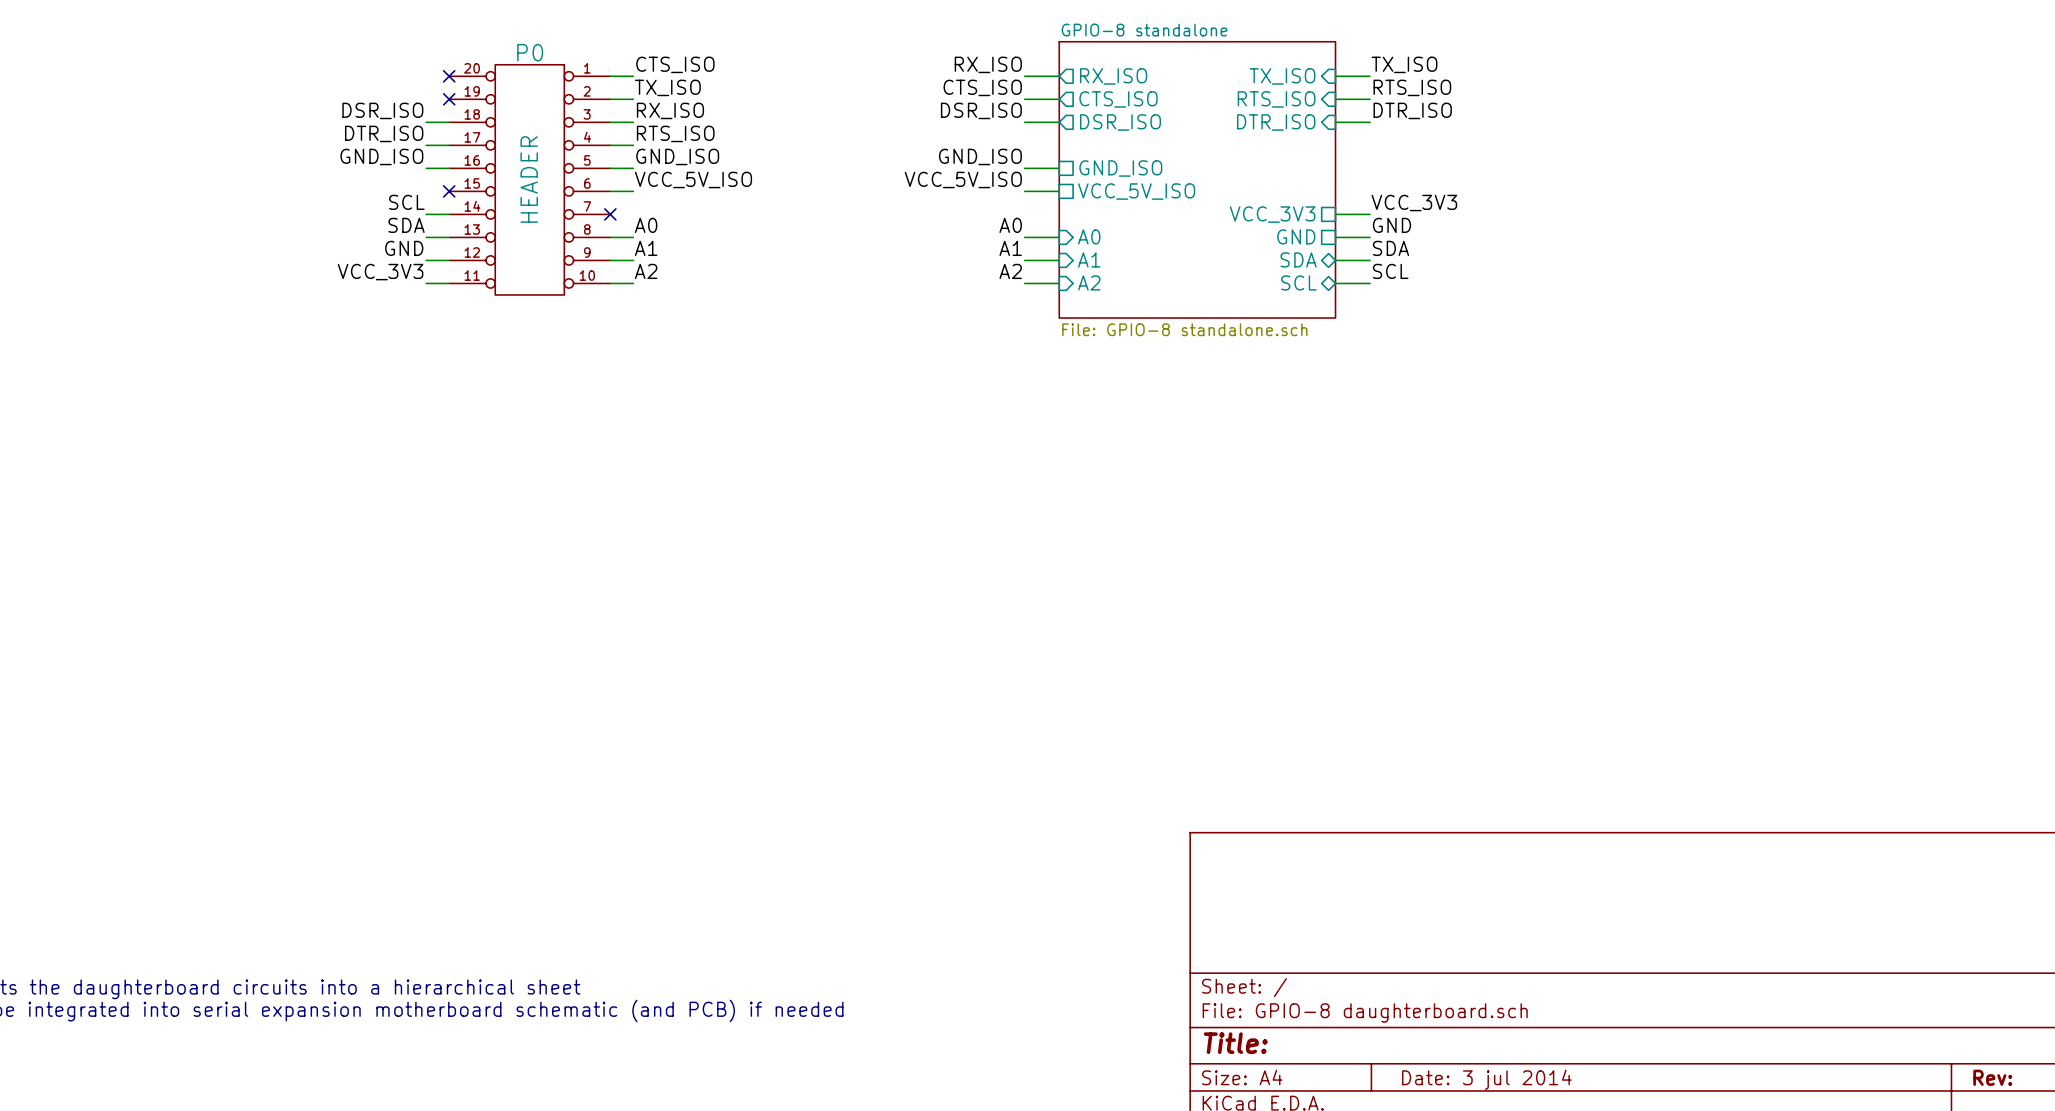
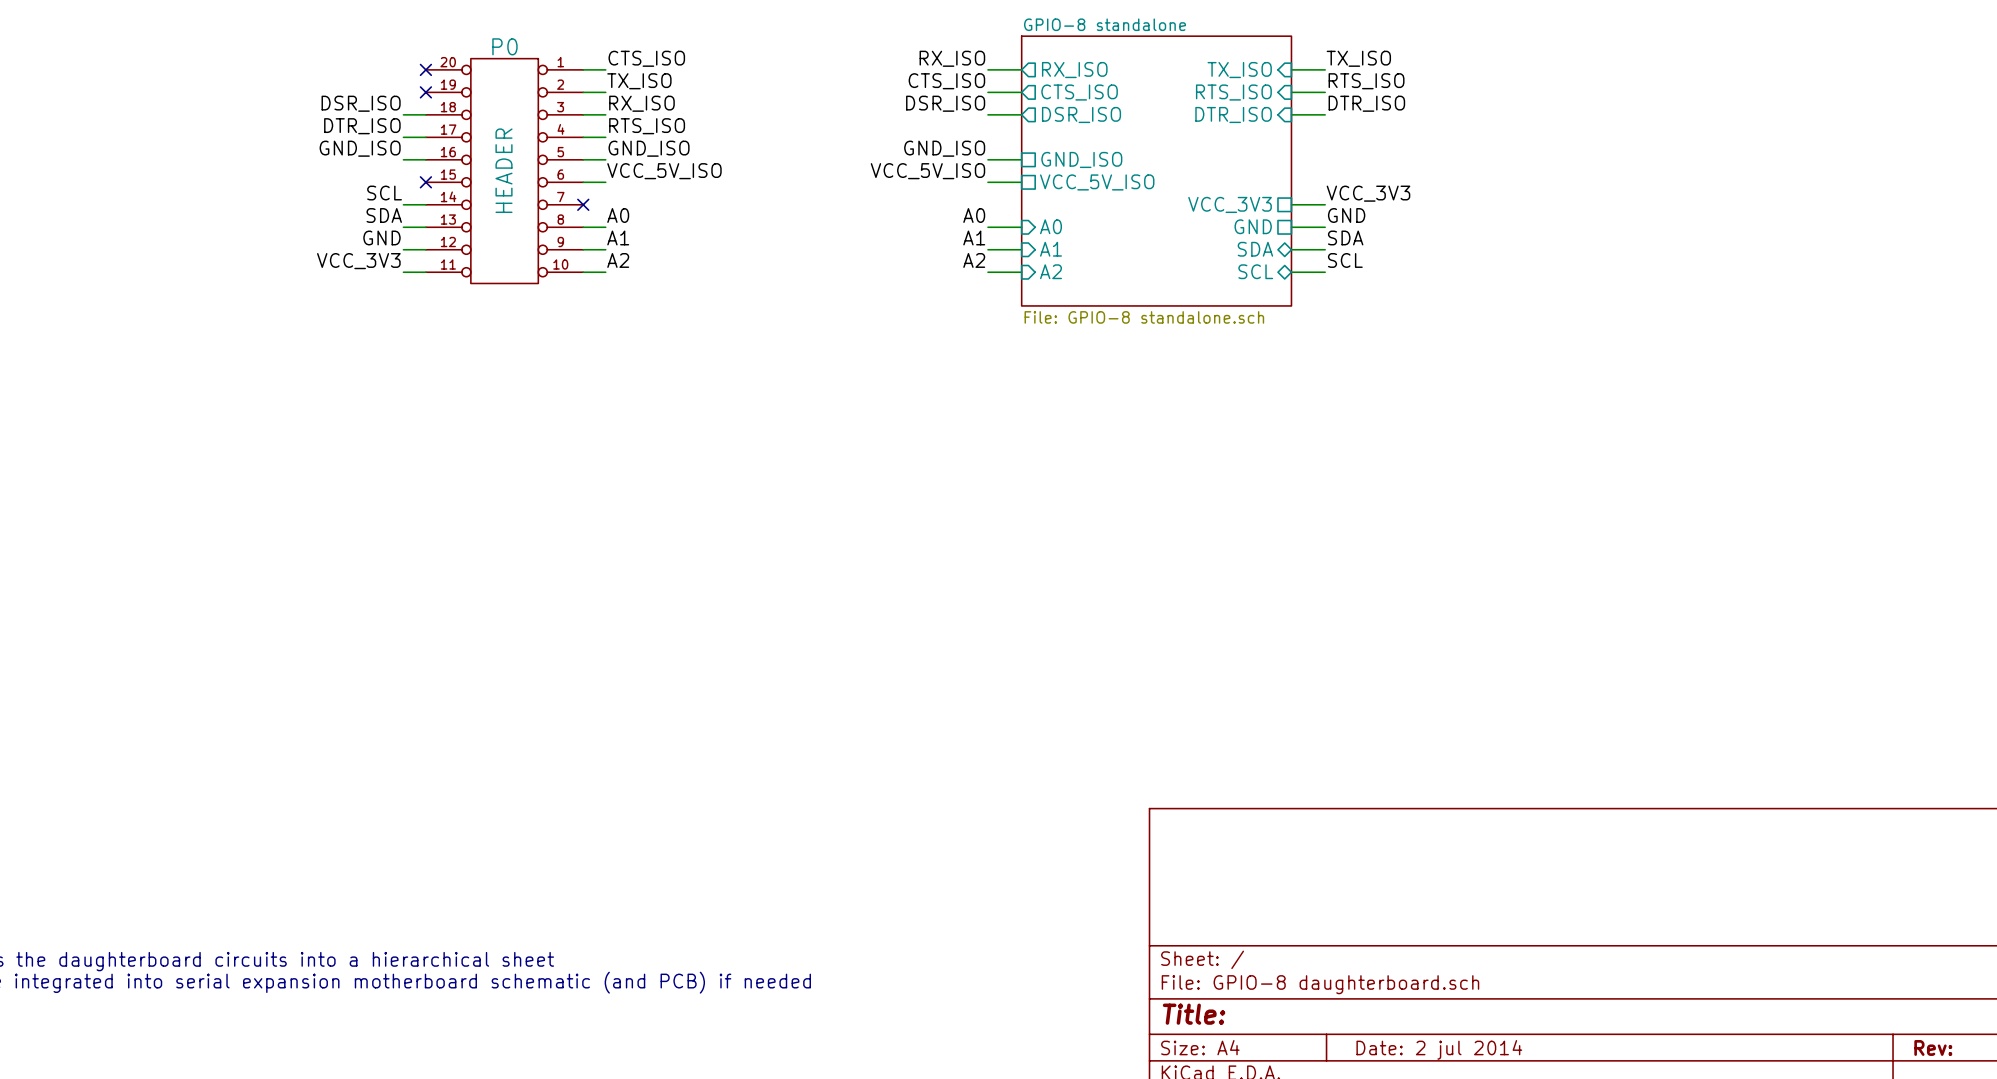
title block: Date: 3 jul 2014 (1486, 1079) -> Date: 2 jul 2014 (1439, 1049)

